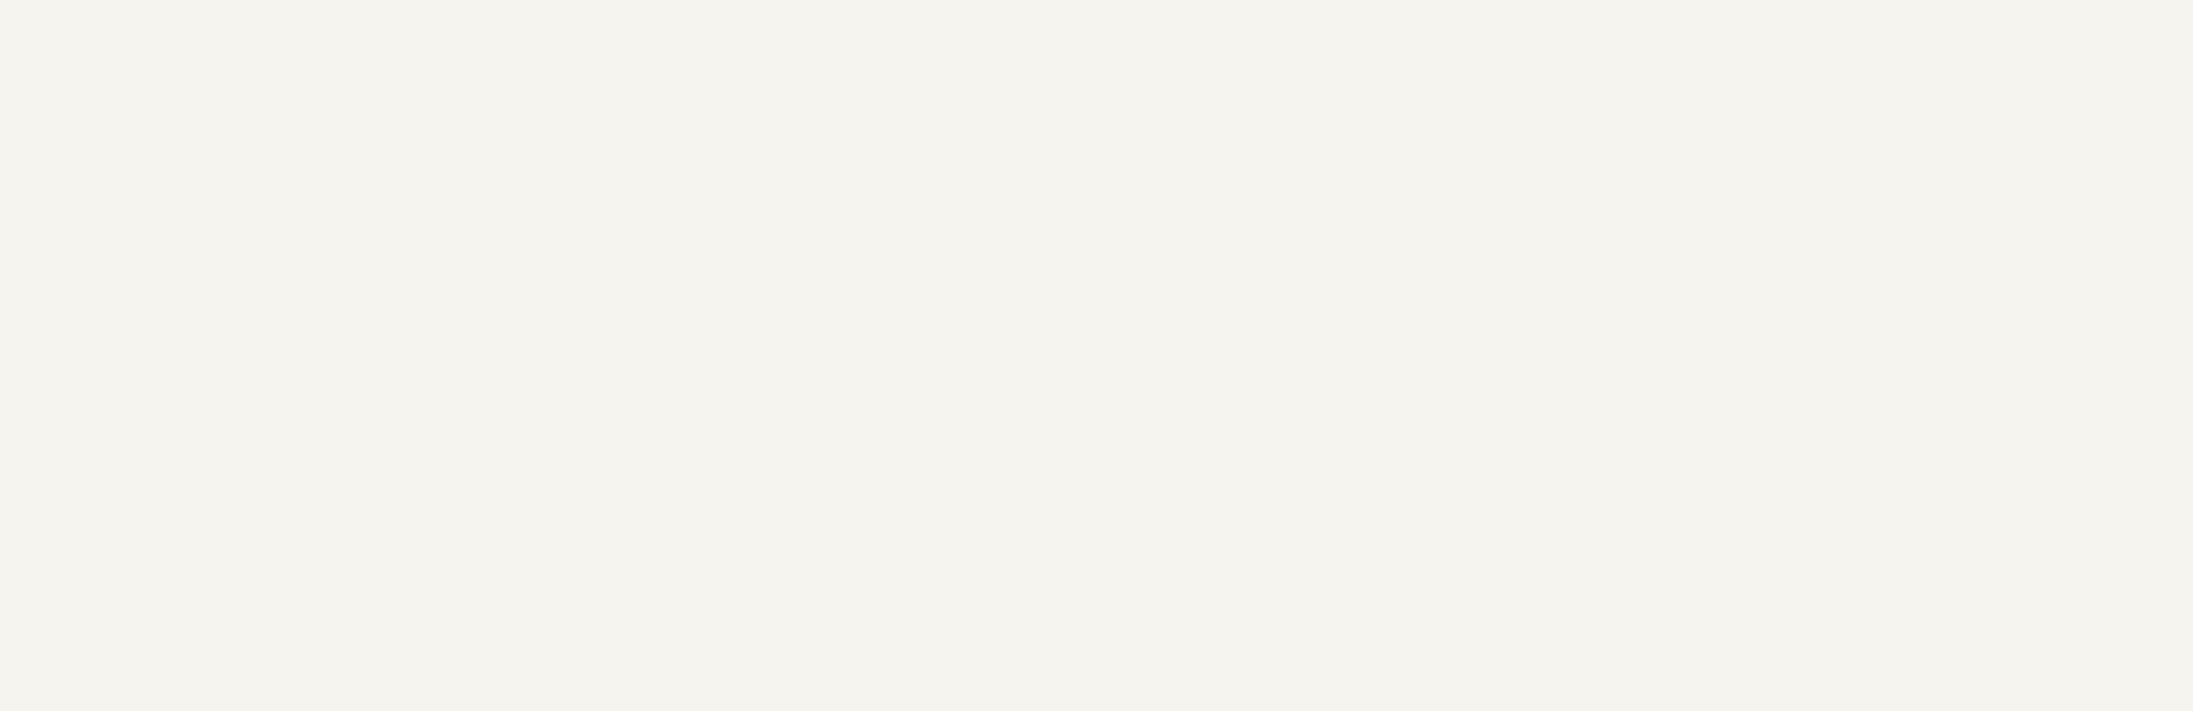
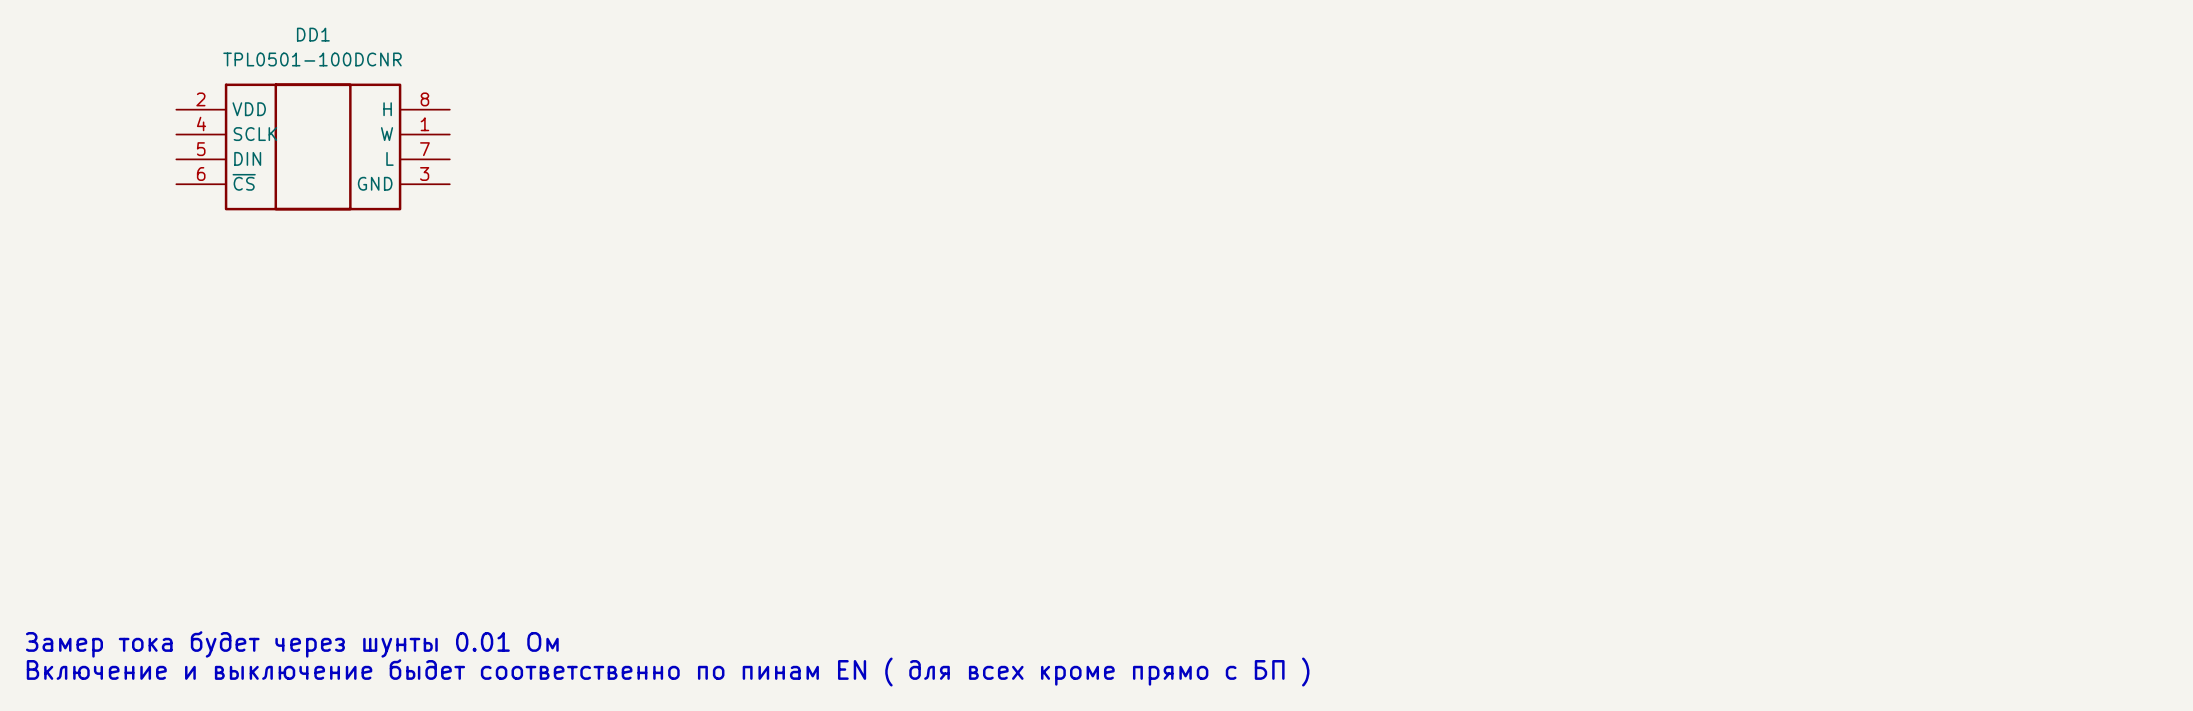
DD1: none -> TPL0501-100DCNR (313, 146)
text: none -> Замер тока будет через шунты 0.01 Ом (292, 644)
text: none -> Включение и выключение быдет соответственно по пинам EN ( для всех кроме прямо с БП ) (668, 672)

